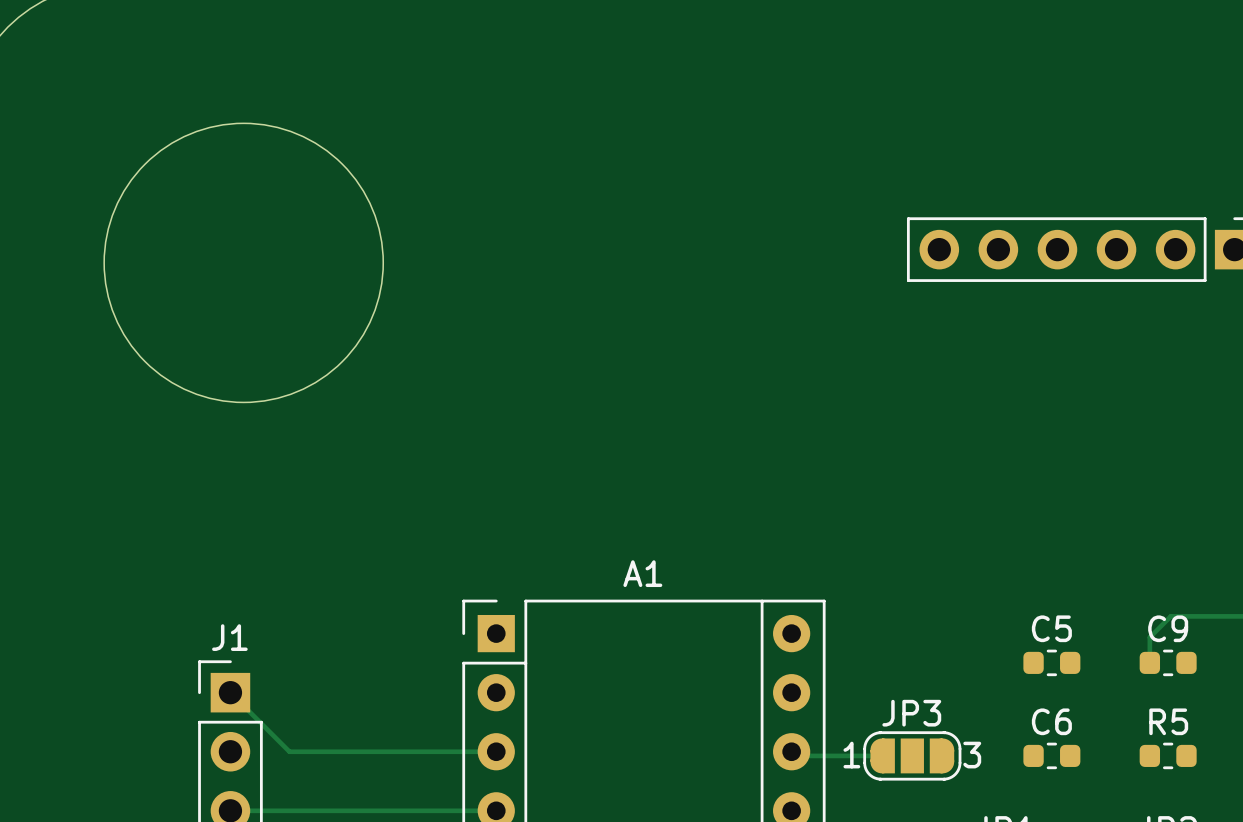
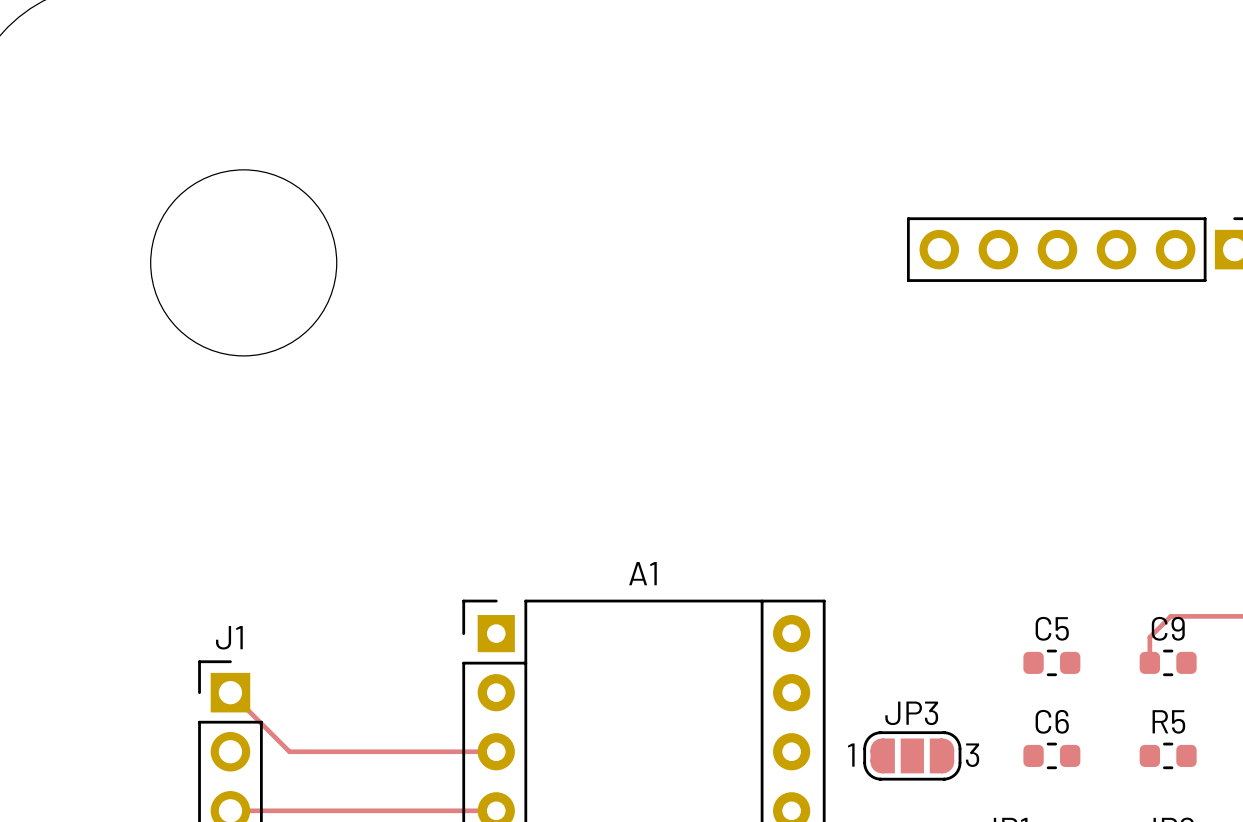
round board edge size: [103, 122, 384, 404] -> [150, 169, 338, 357]
track: (791, 751) (795, 755) (882, 755) -> none

